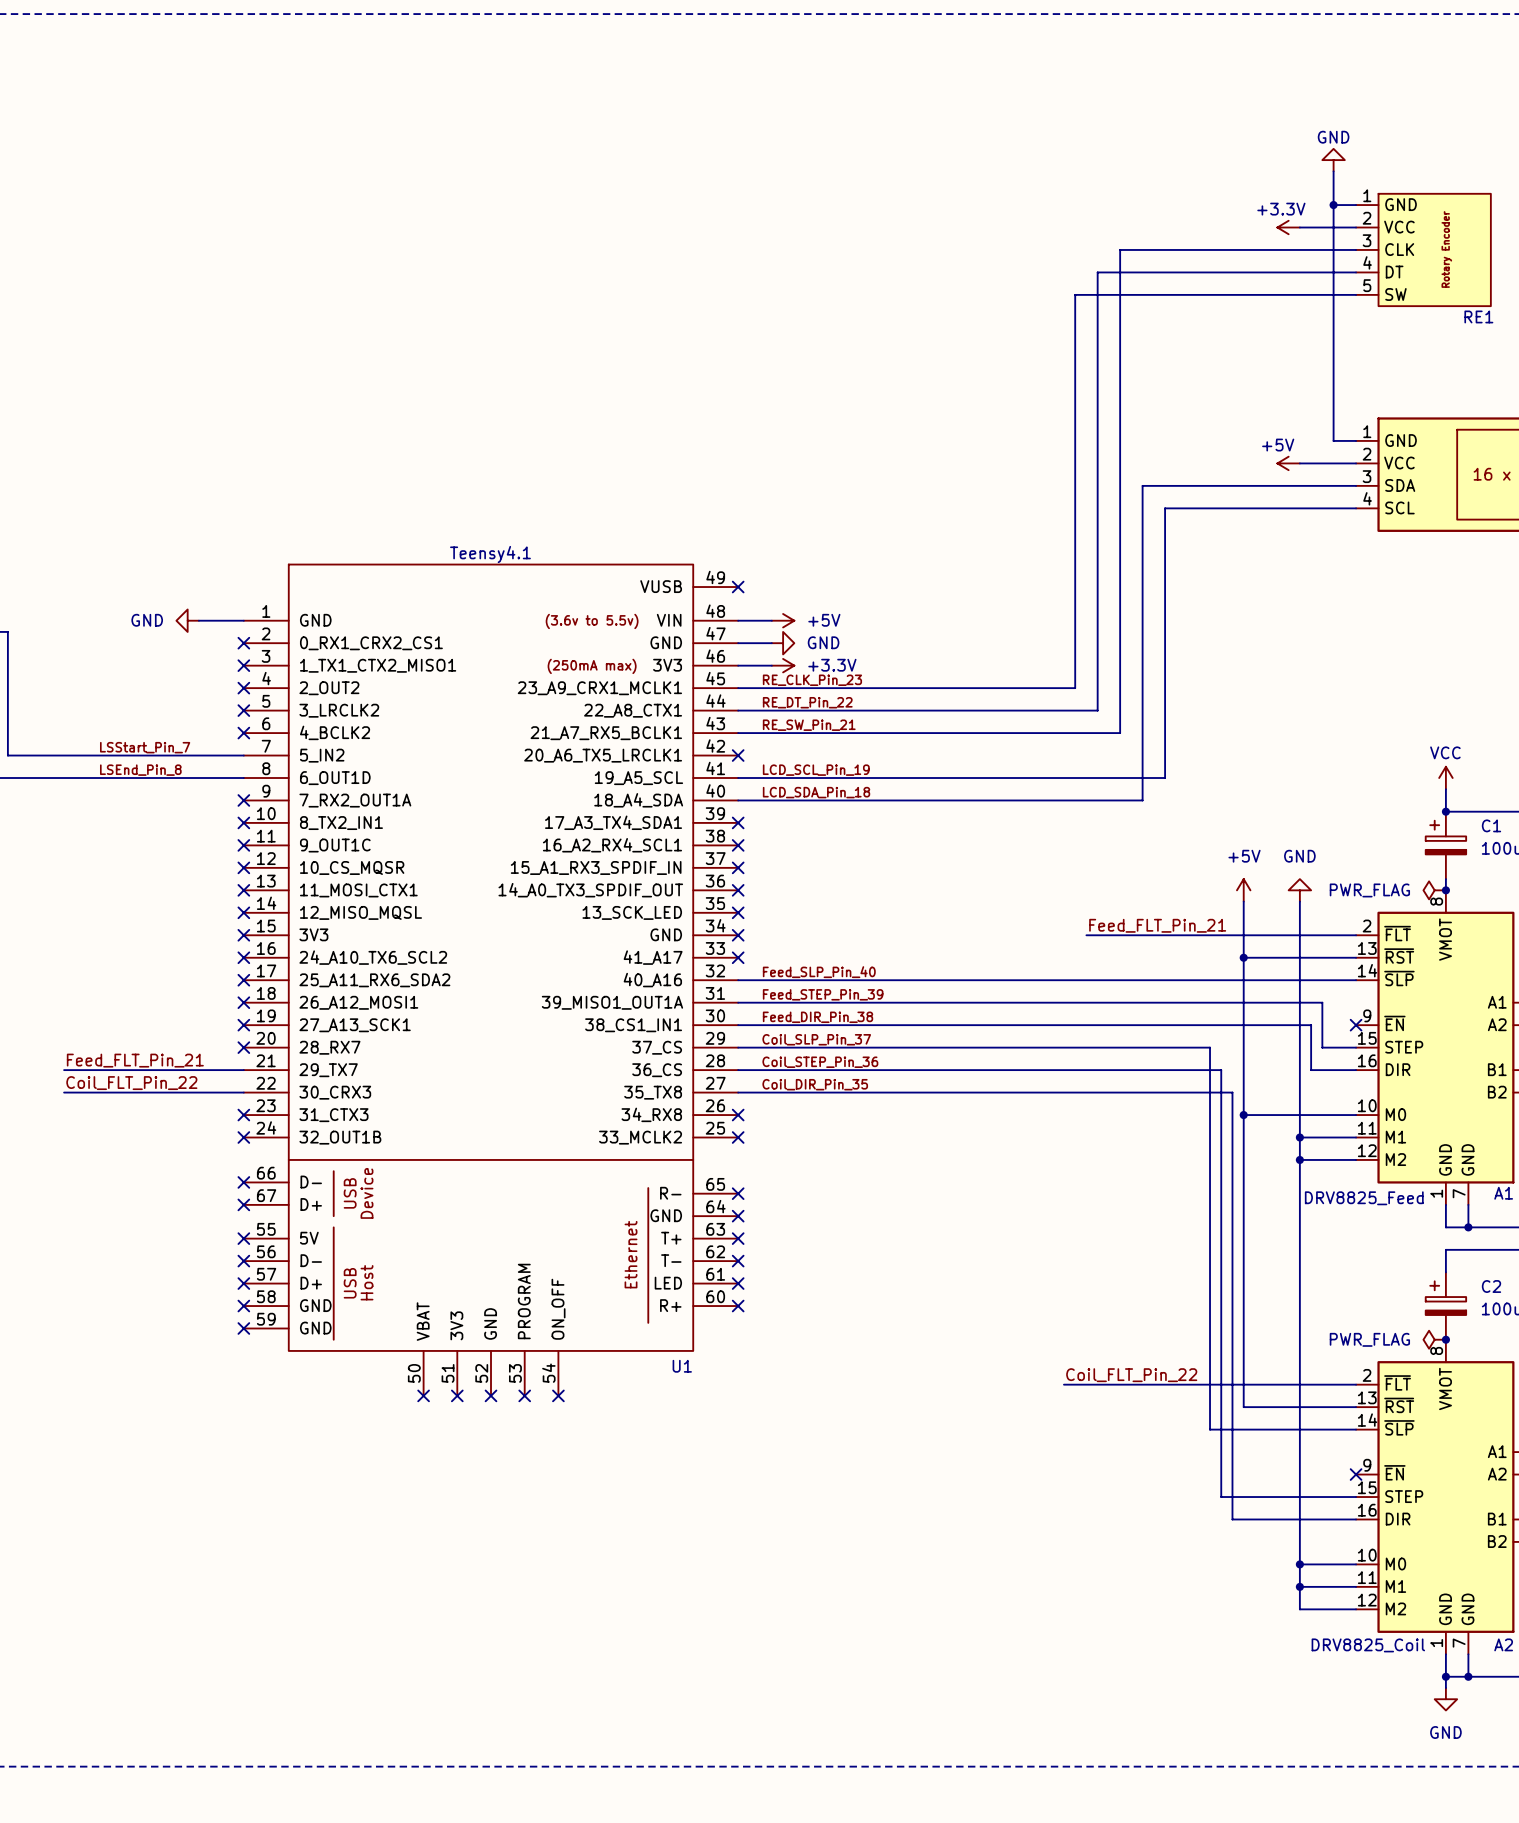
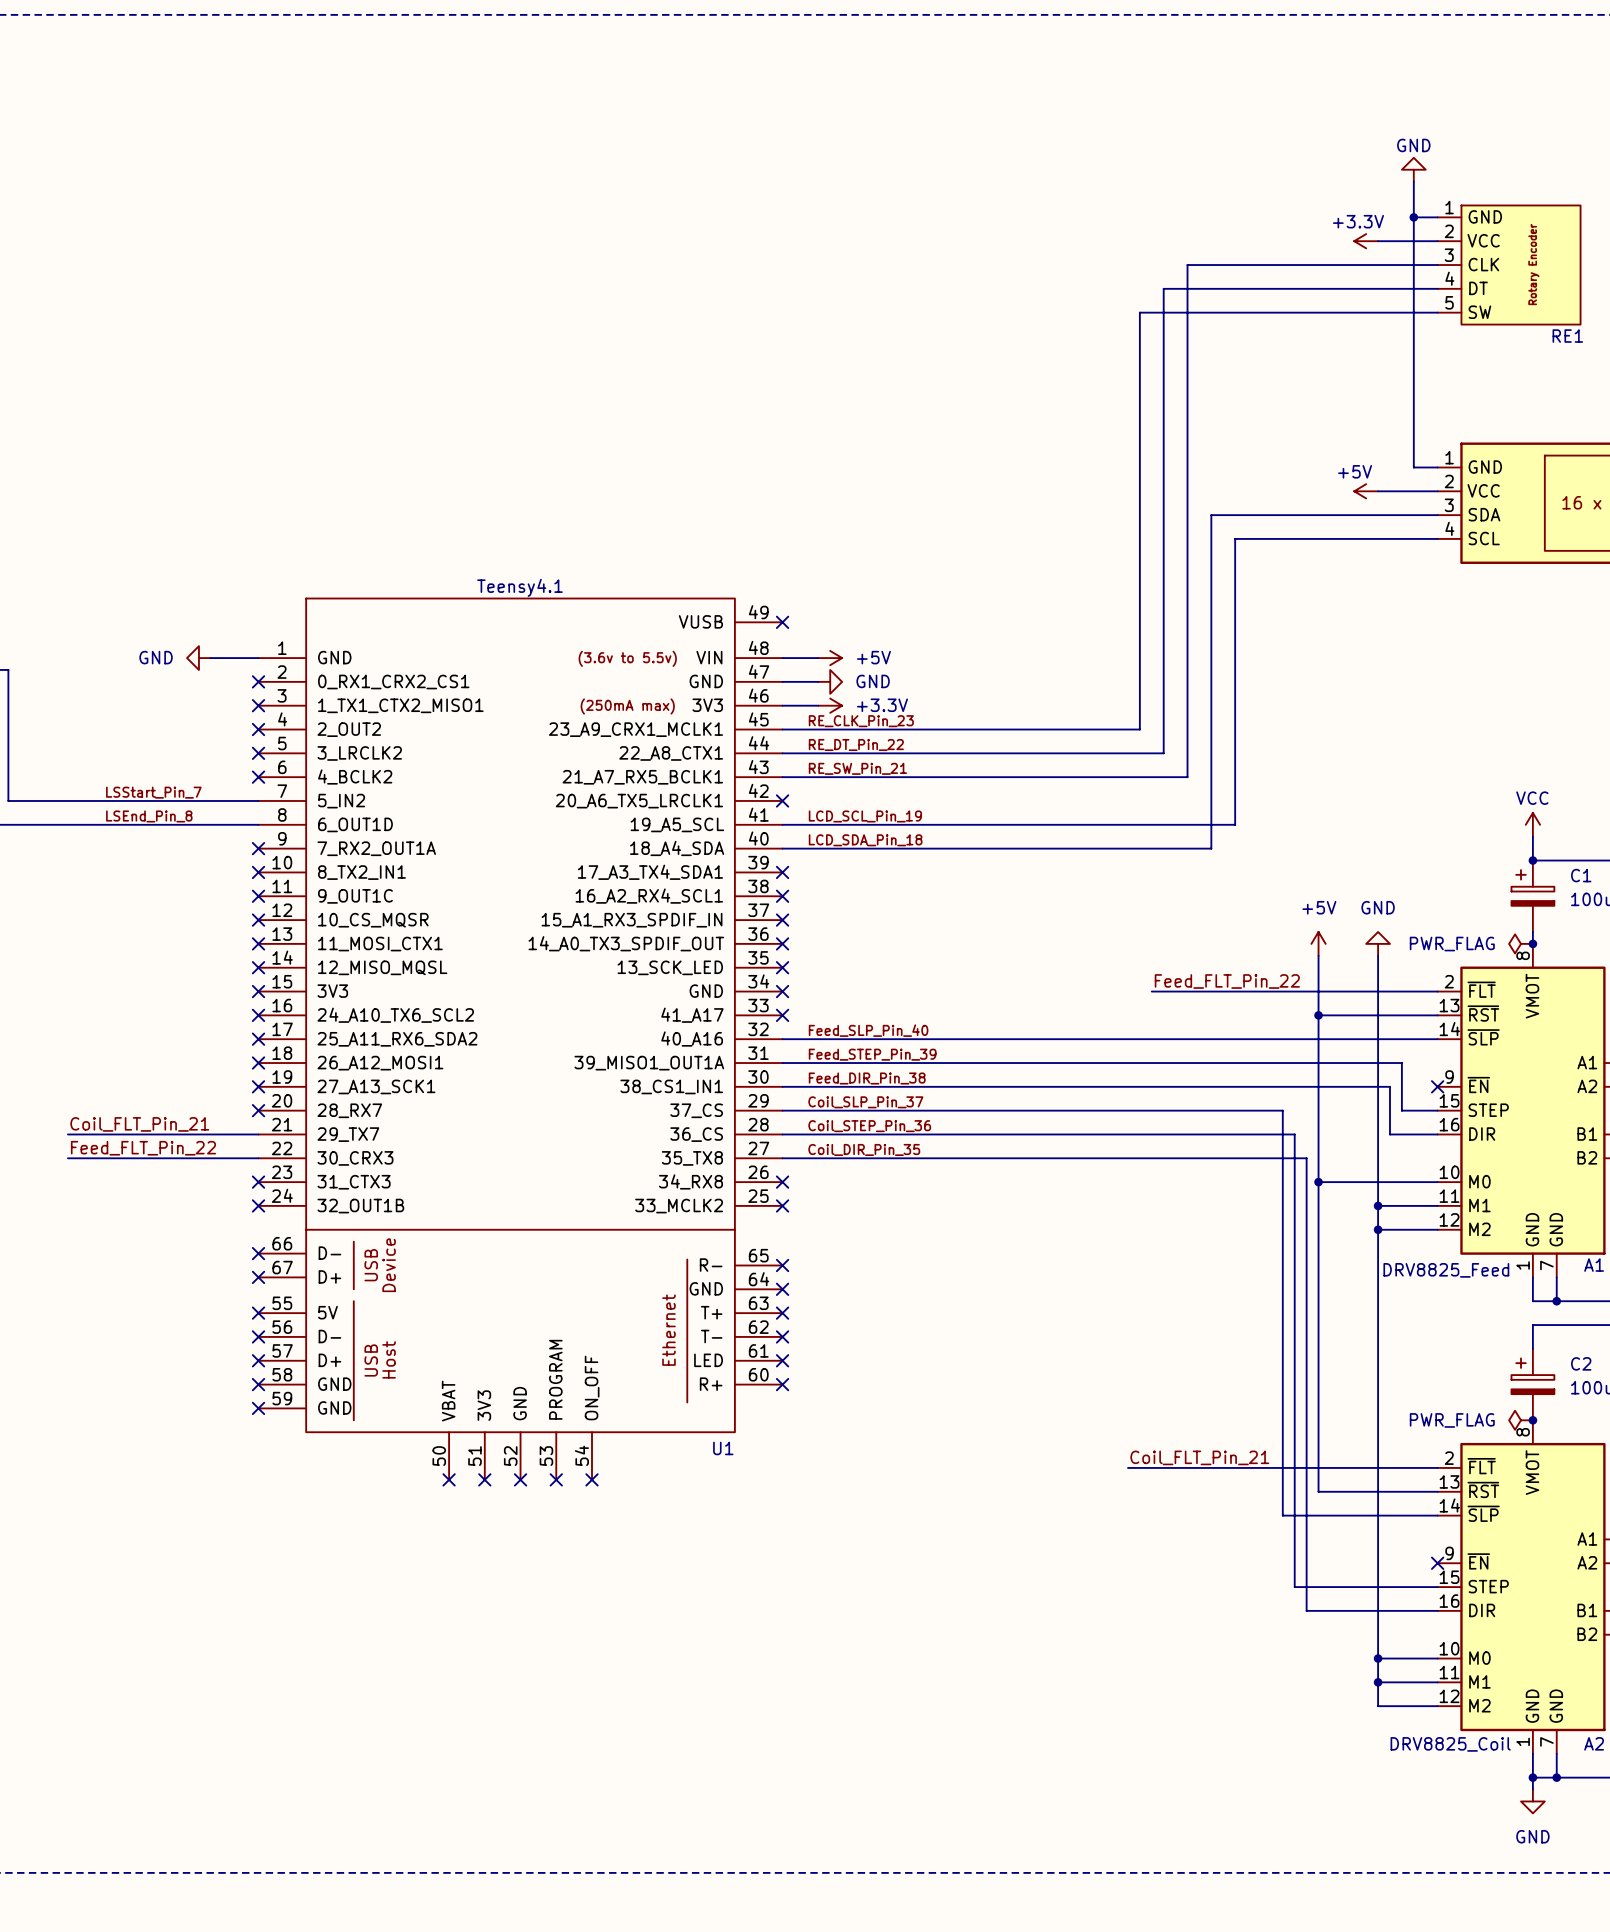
label: Feed_FLT_Pin_21 (1157, 925) -> Feed_FLT_Pin_22 (1227, 981)
label: Feed_FLT_Pin_21 (135, 1060) -> Coil_FLT_Pin_21 (139, 1124)
label: Coil_FLT_Pin_22 (131, 1083) -> Feed_FLT_Pin_22 (143, 1148)
label: Coil_FLT_Pin_22 (1131, 1375) -> Coil_FLT_Pin_21 (1199, 1457)

